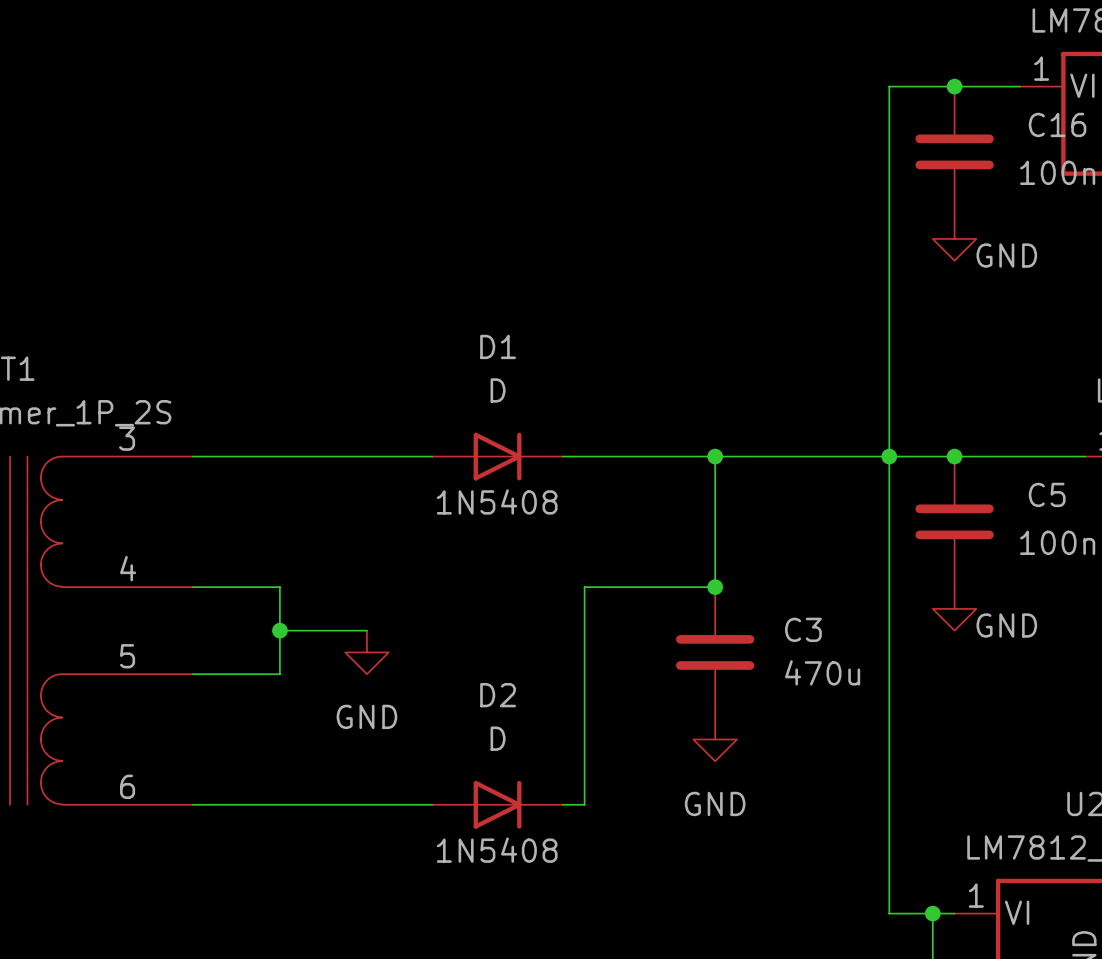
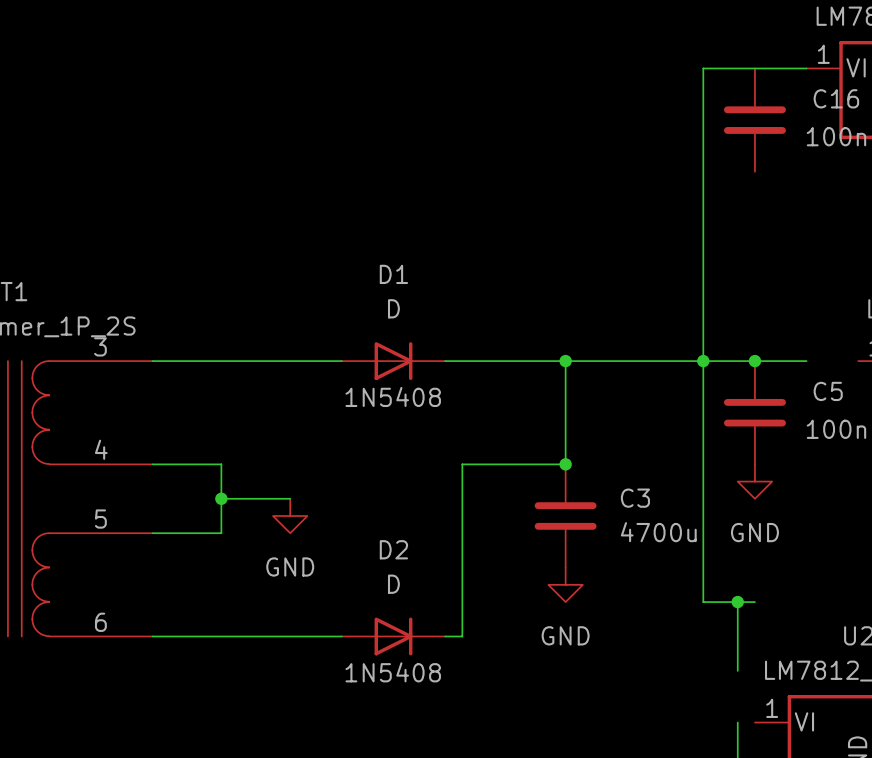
junction: (954, 86) -> none
power symbol: GND (954, 238) -> none
wire: (1019, 456) (1085, 456) -> none
power symbol text position: GND (1006, 625) -> GND (754, 532)
C3 value: 470u (822, 672) -> 4700u (658, 532)
wire: (889, 761) (889, 913) (954, 913) -> (703, 602) (754, 602)
wire: none -> (737, 602) (737, 670)
junction: none -> (737, 602)
junction: (932, 913) -> none

